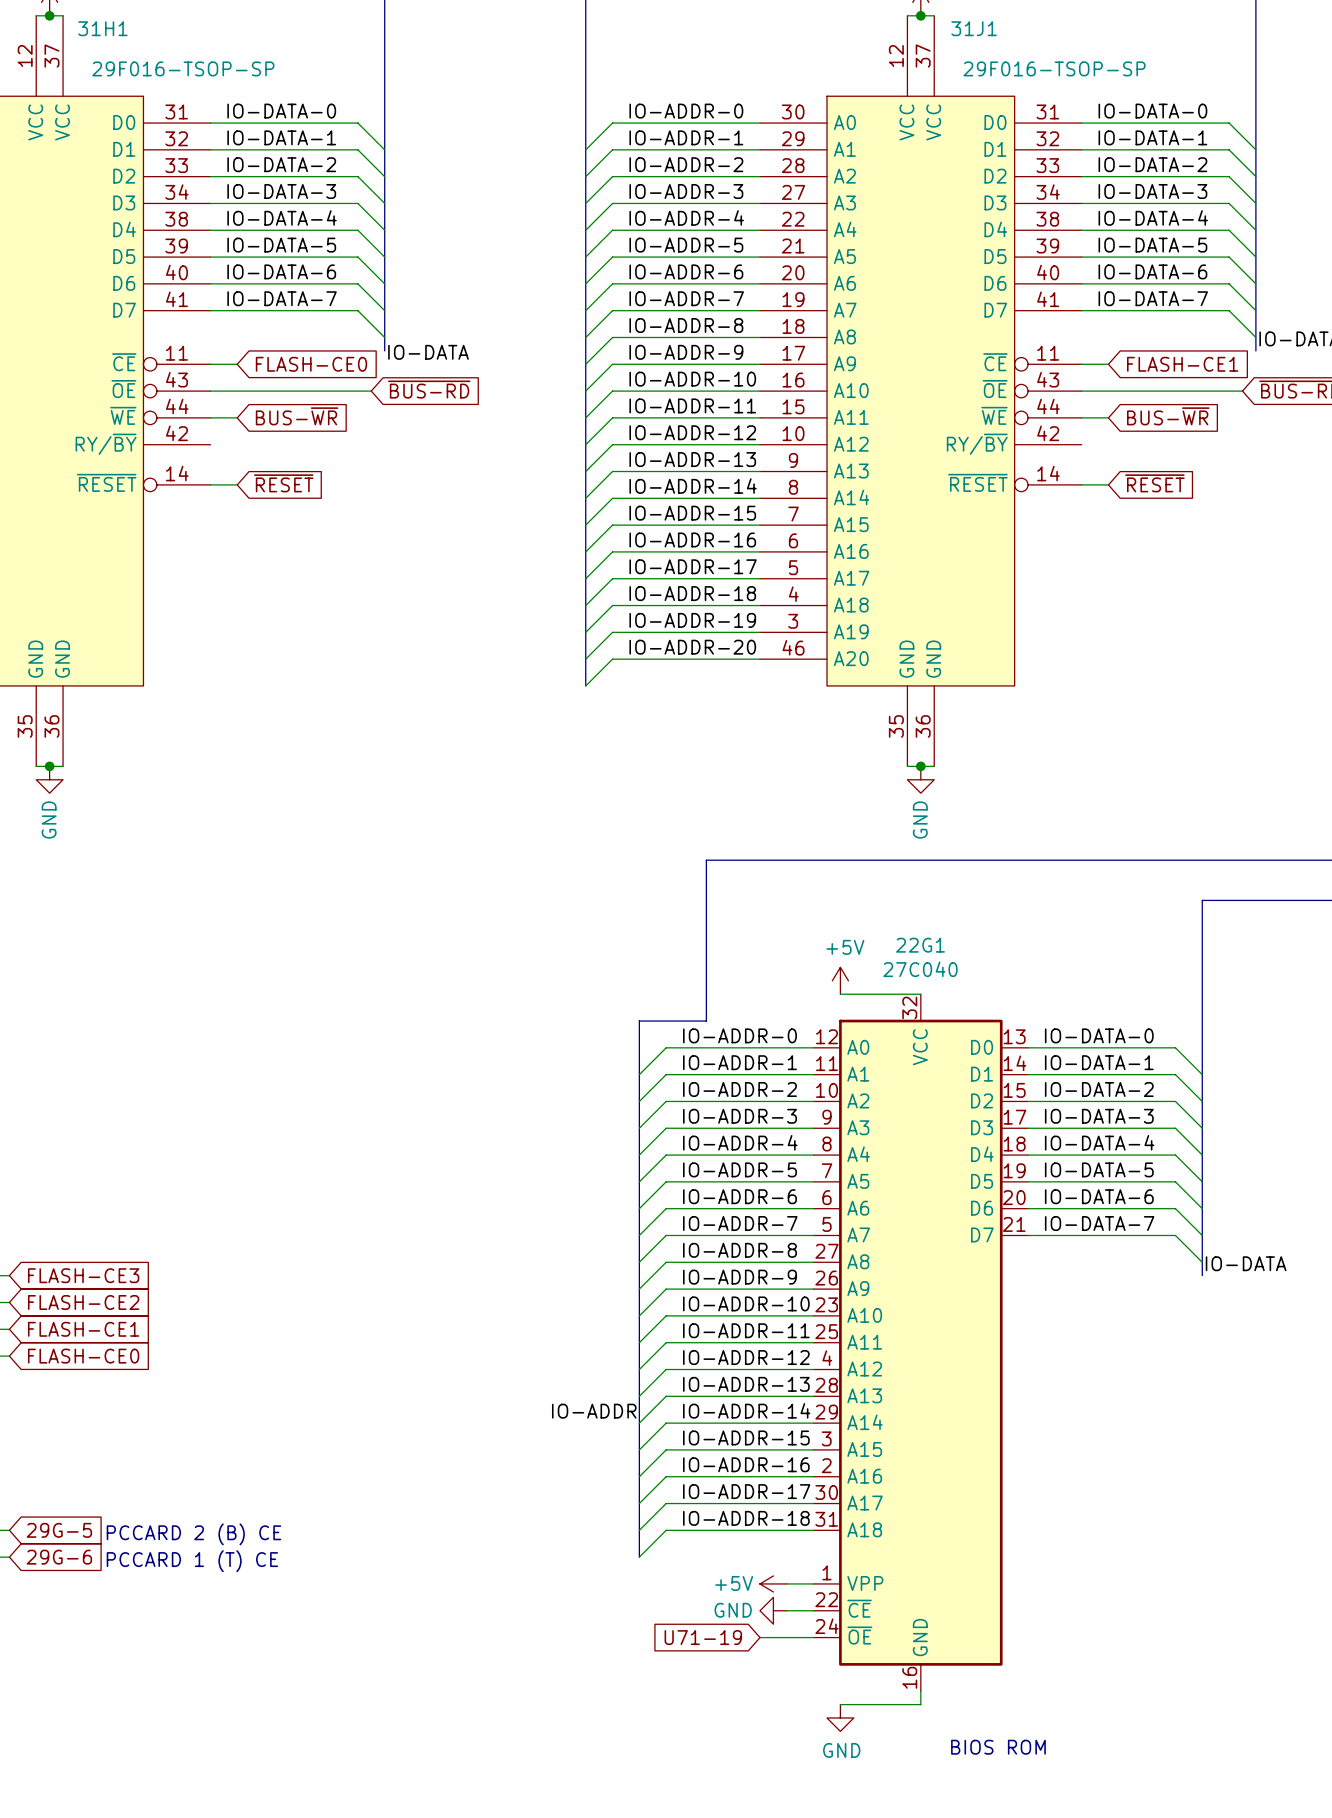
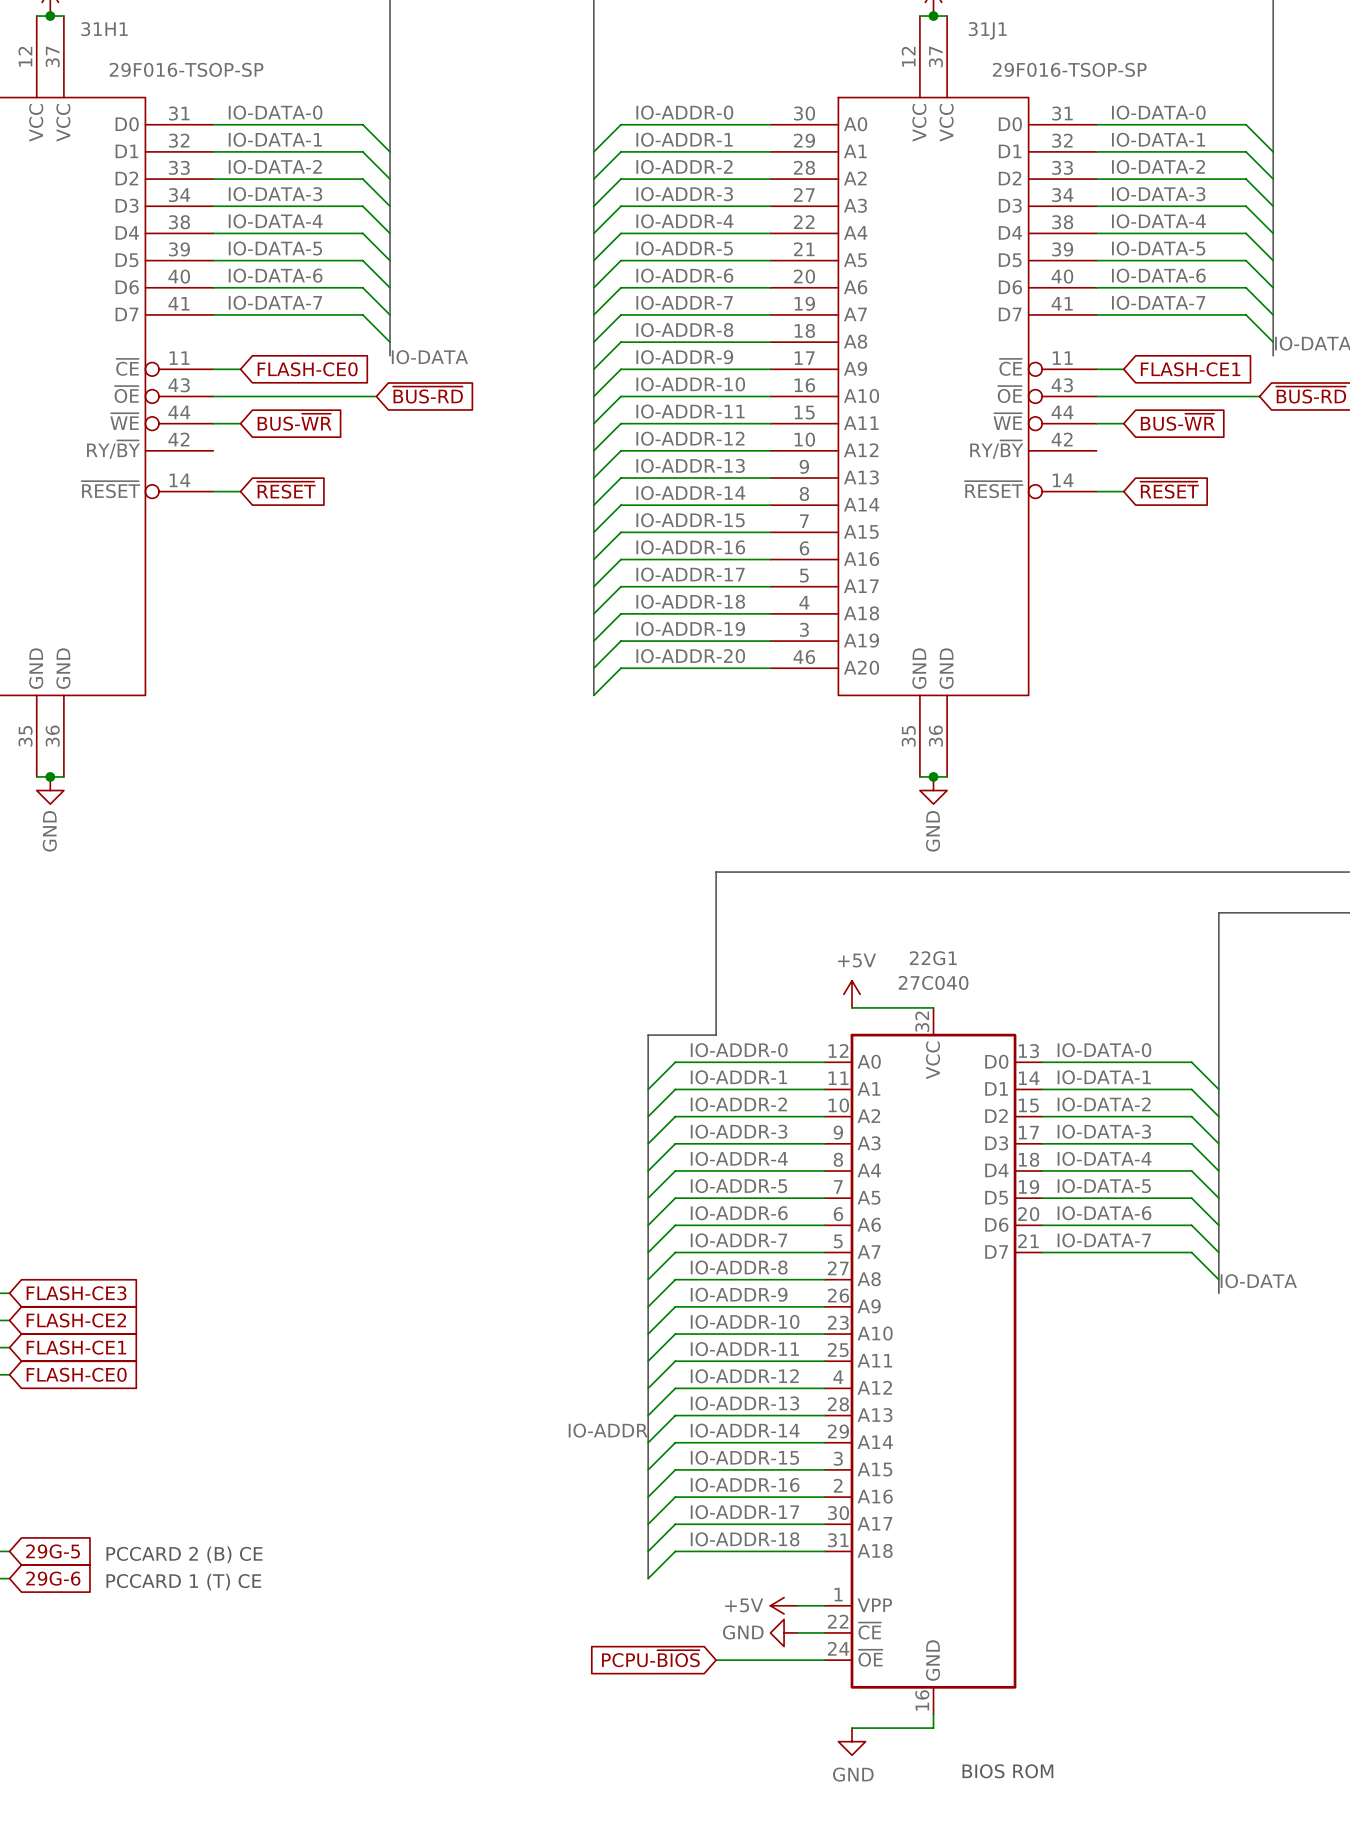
global label: none -> PCPU-~{BIOS} (650, 1658)
global label: U71-19 (703, 1637) -> none
wire: none -> (716, 1660) (770, 1660)

